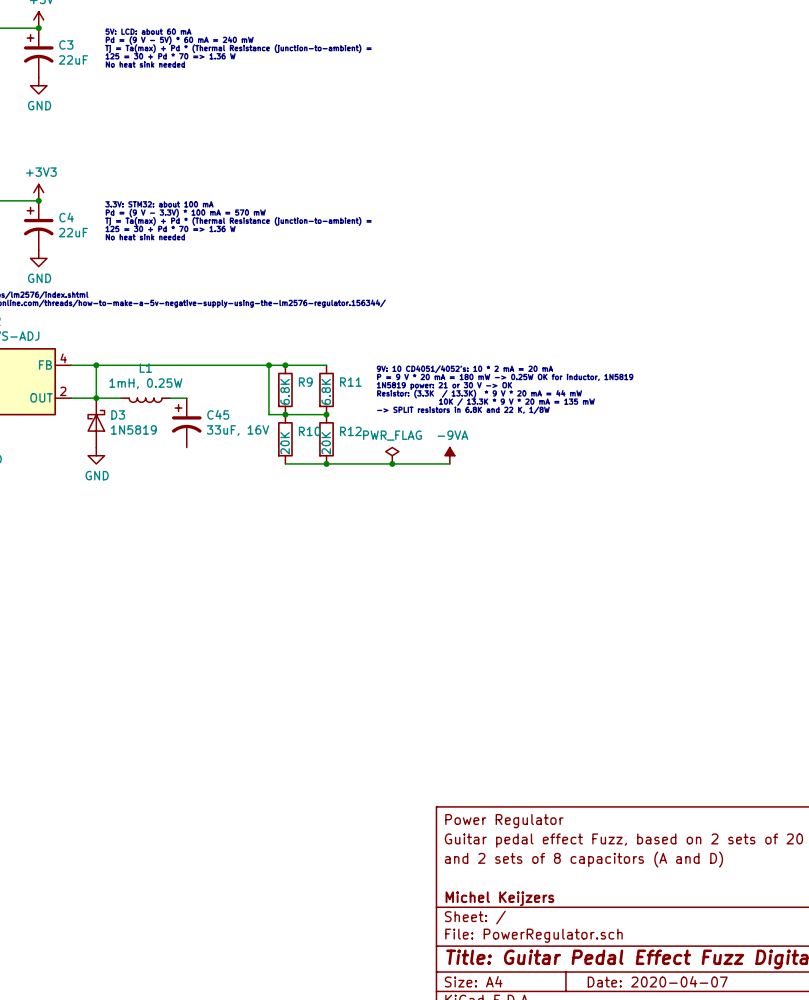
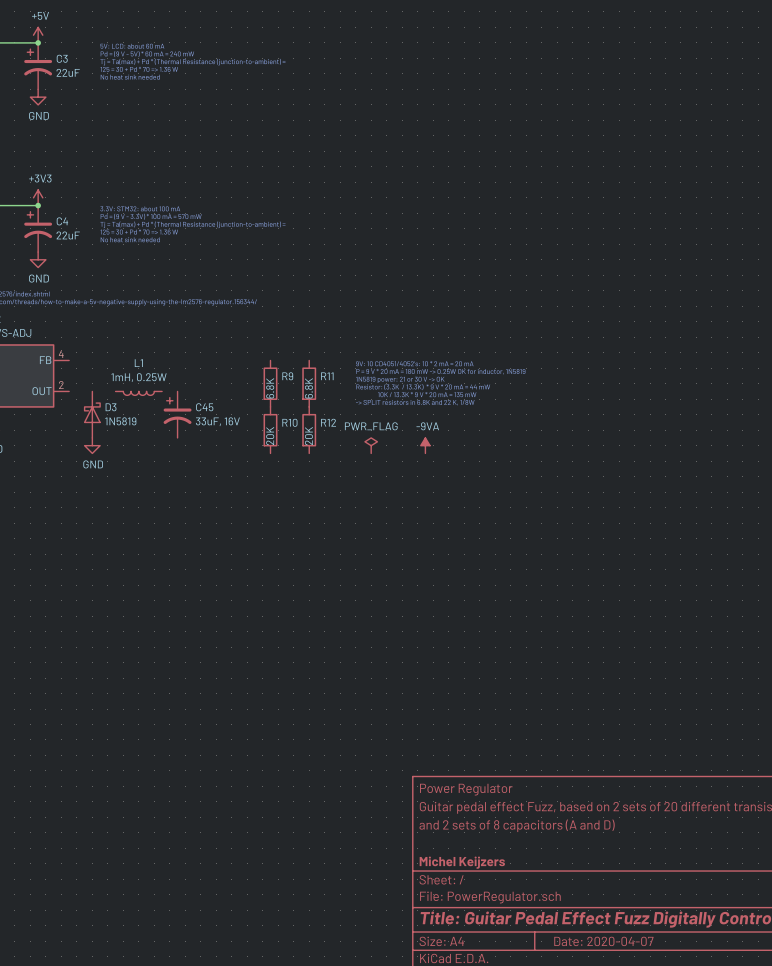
wire: (71, 365) (326, 365) -> none
wire: (96, 365) (96, 398) -> none
junction: (96, 365) -> none
wire: (268, 365) (268, 414) (326, 414) -> none
junction: (268, 365) -> none
junction: (285, 365) -> none
wire: (71, 398) (120, 398) -> none
junction: (96, 398) -> none
wire: (170, 398) (186, 398) -> none
junction: (285, 414) -> none
junction: (326, 414) -> none
wire: (285, 463) (449, 463) -> none
junction: (326, 463) -> none
junction: (392, 463) -> none

